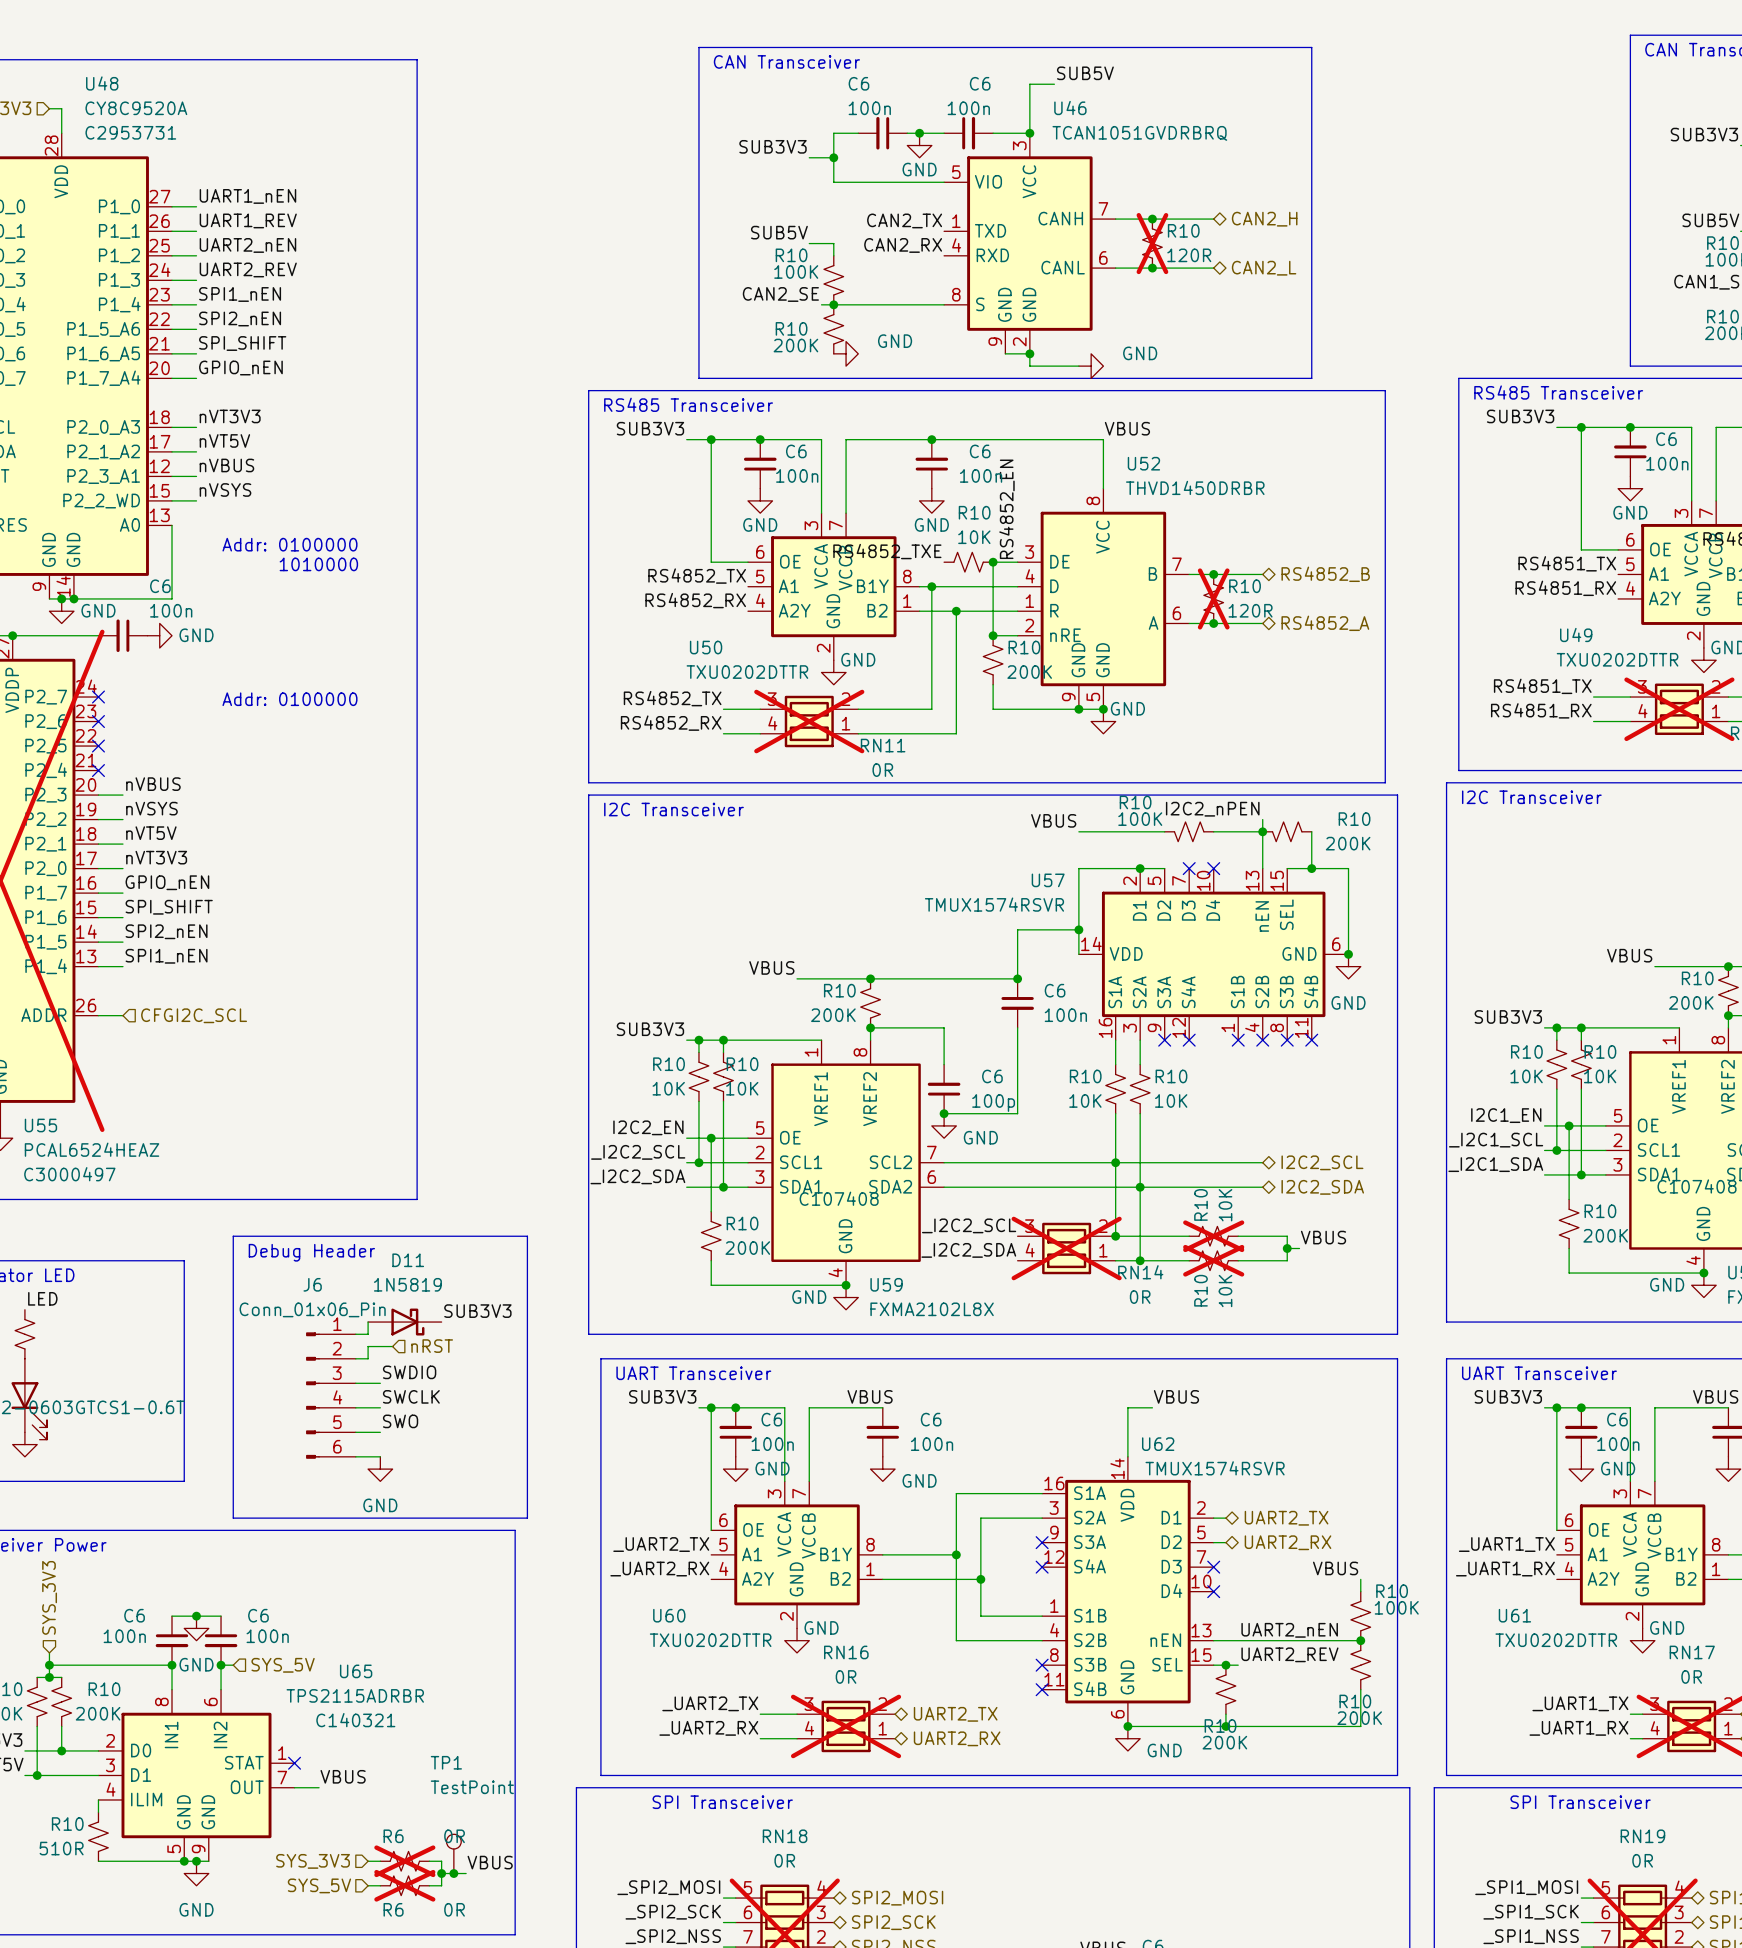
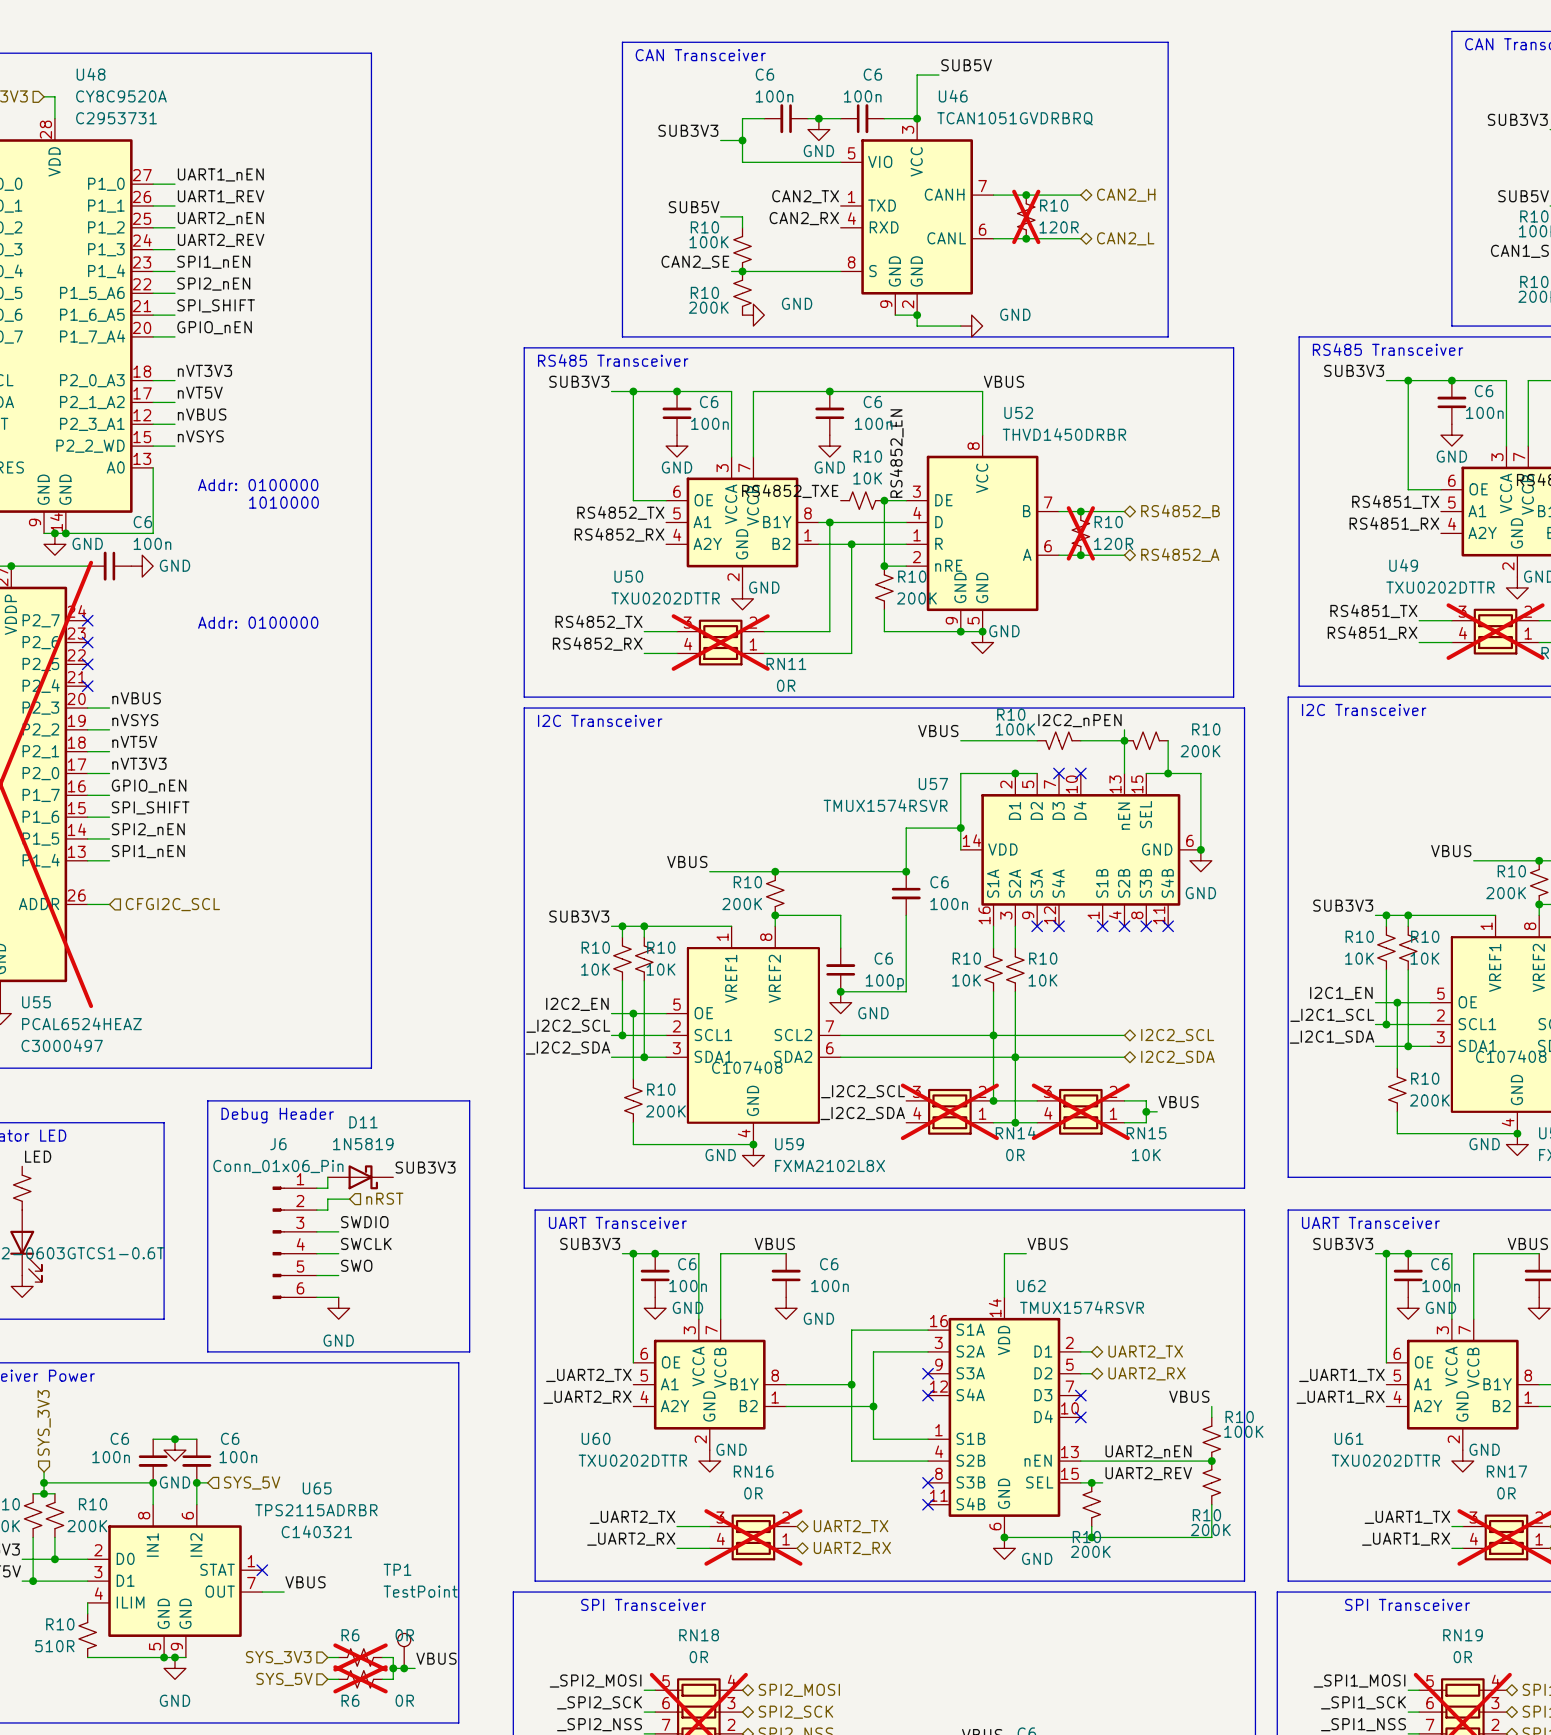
R10: 10K (1213, 1236) -> none
RN15: none -> 10K (1080, 1111)
R10: 10K (1213, 1260) -> none

